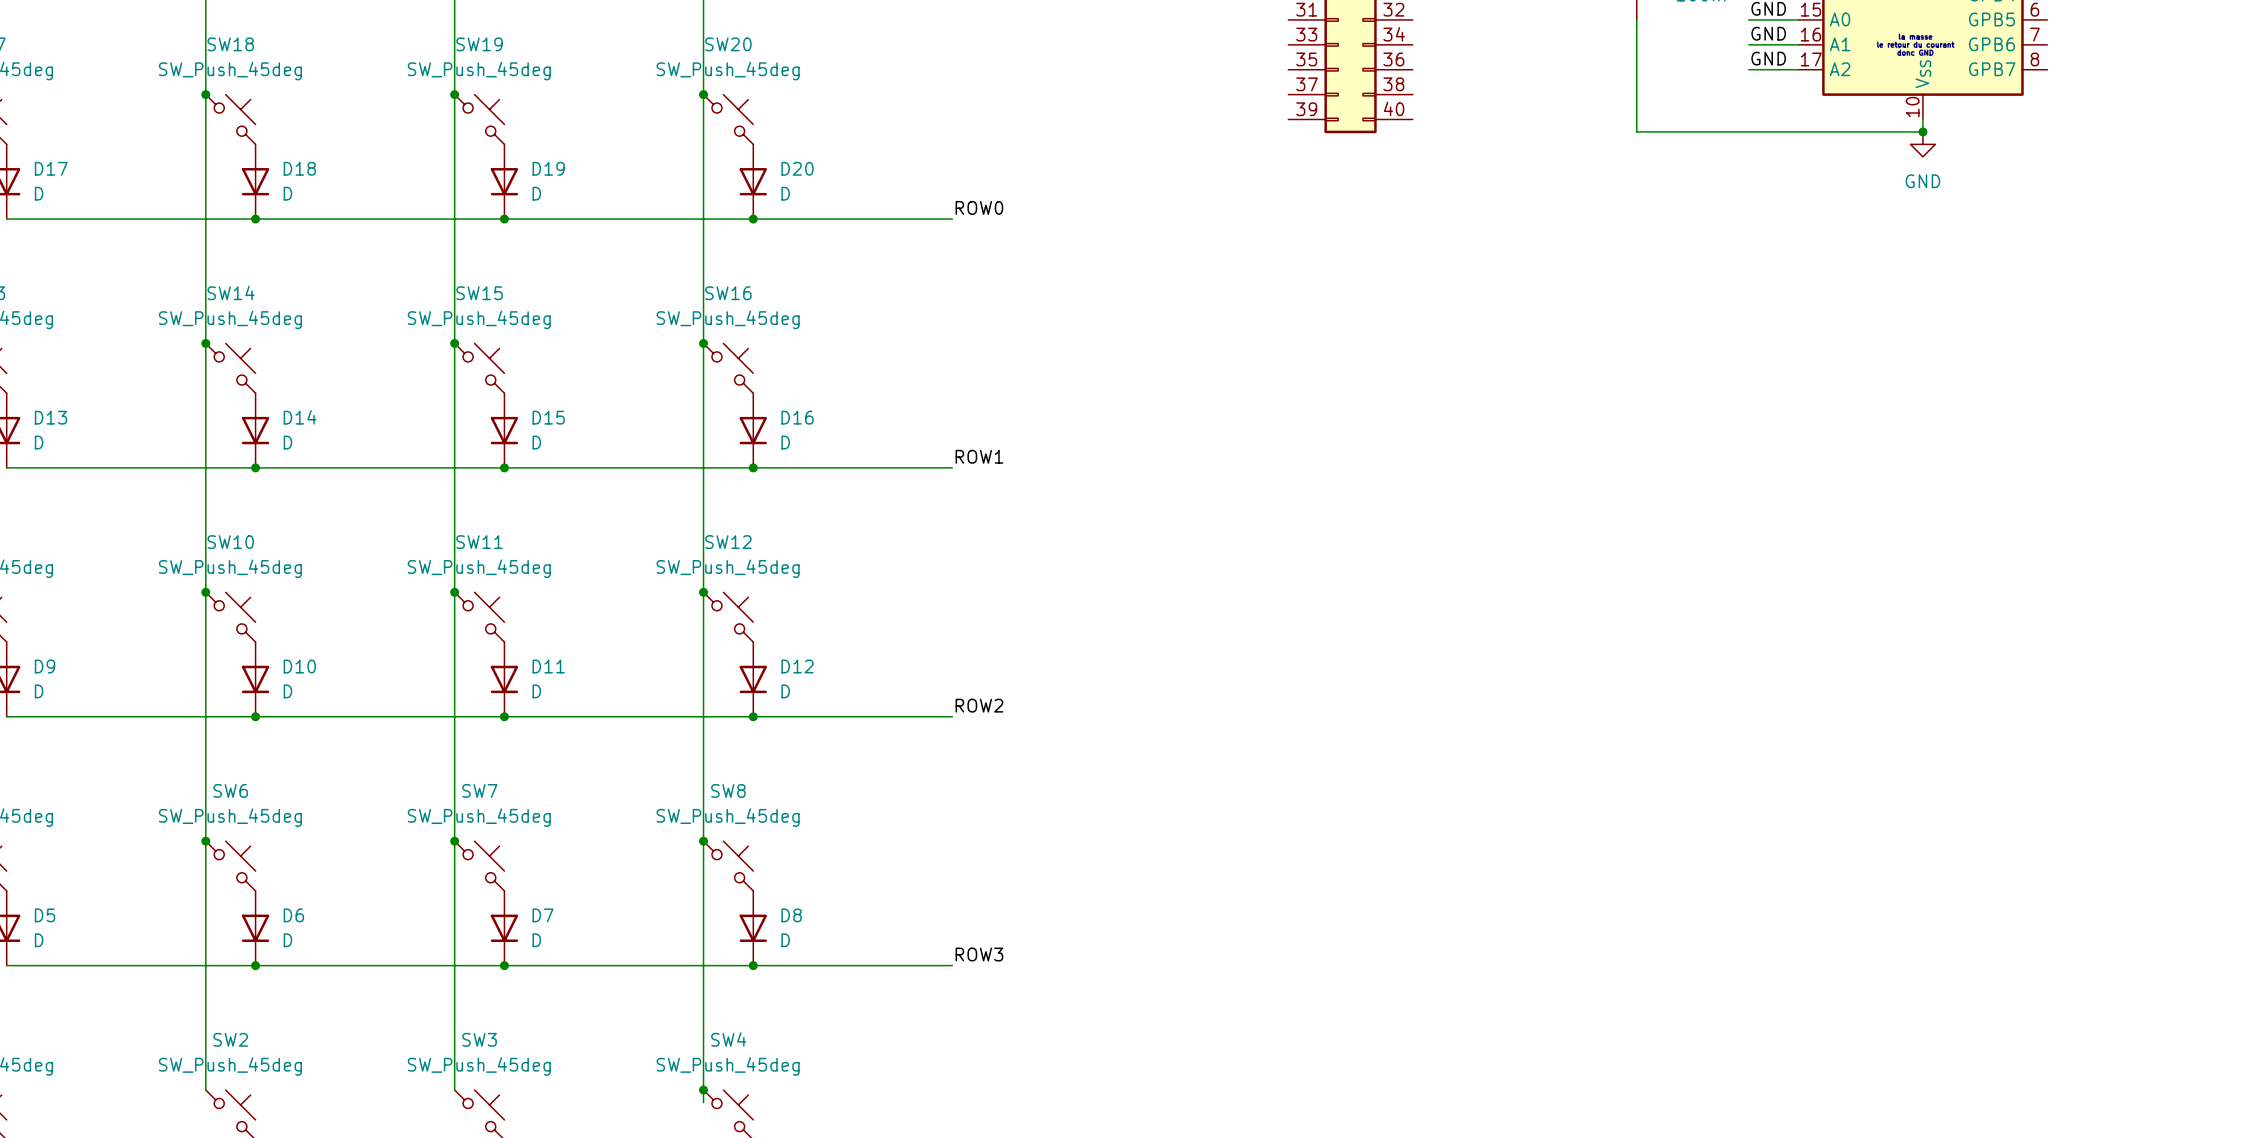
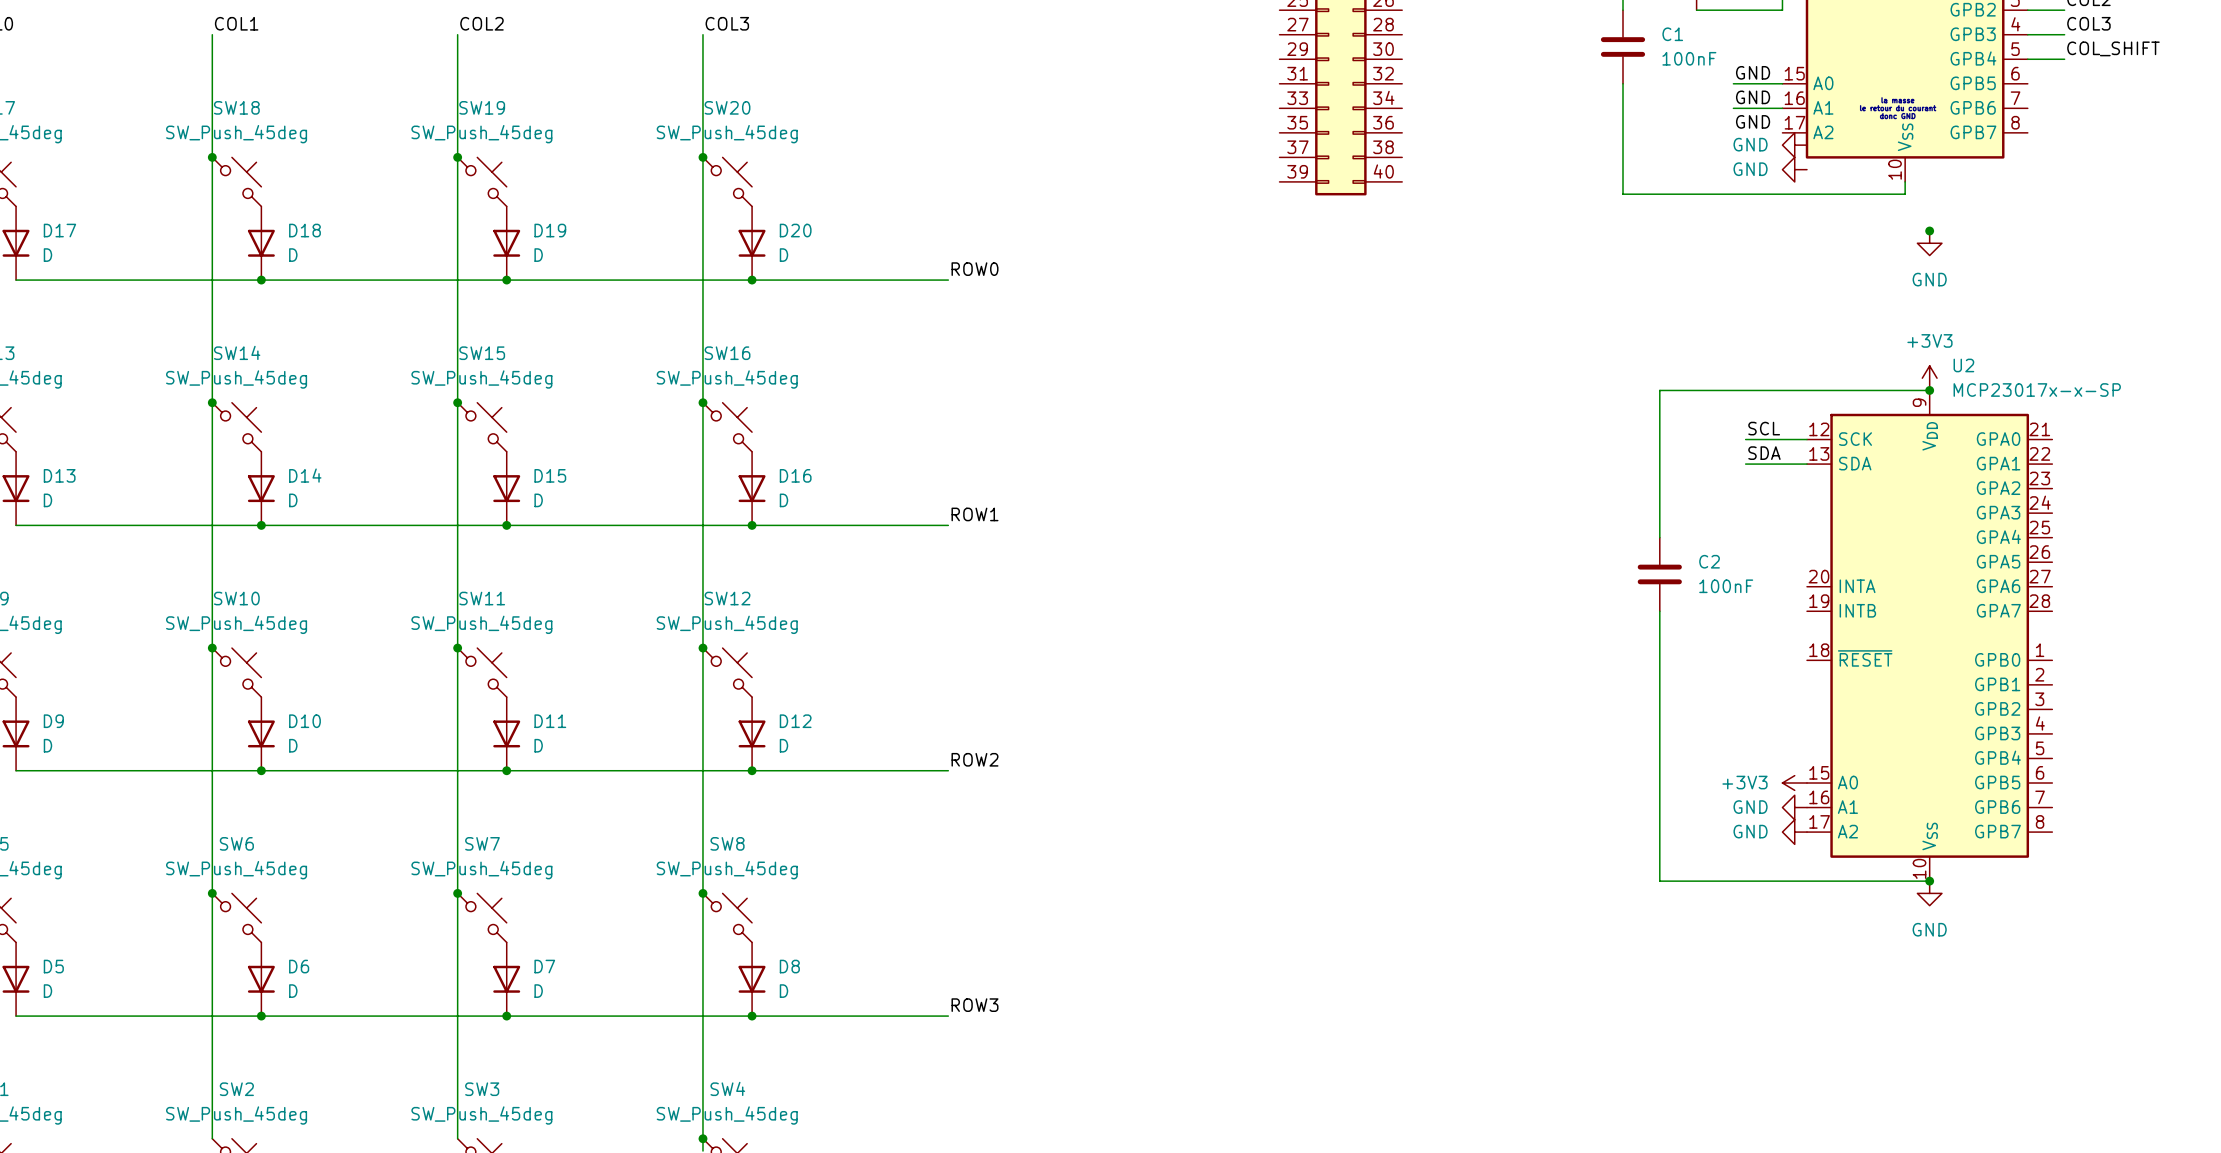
wire: (1748, 69) (1798, 69) -> none
power symbol: none -> GND (1794, 145)
power symbol: none -> GND (1794, 169)
junction position: (1922, 131) -> (1929, 230)
power symbol position: GND (1922, 144) -> GND (1929, 243)
power symbol: none -> +3V3 (1929, 378)
wire: none -> (1929, 390) (1659, 390) (1659, 537)
junction: none -> (1929, 390)
label: none -> SCL (1764, 428)
wire: none -> (1745, 439) (1807, 439)
label: none -> SDA (1764, 453)
wire: none -> (1745, 464) (1807, 464)
C2: none -> 100nF (1659, 574)
wire: none -> (1659, 611) (1659, 881) (1929, 881)
U2: none -> MCP23017x-x-SP (1929, 635)
power symbol: none -> +3V3 (1794, 783)
power symbol: none -> GND (1794, 807)
power symbol: none -> GND (1794, 832)
junction: none -> (1929, 881)
power symbol: none -> GND (1929, 893)

